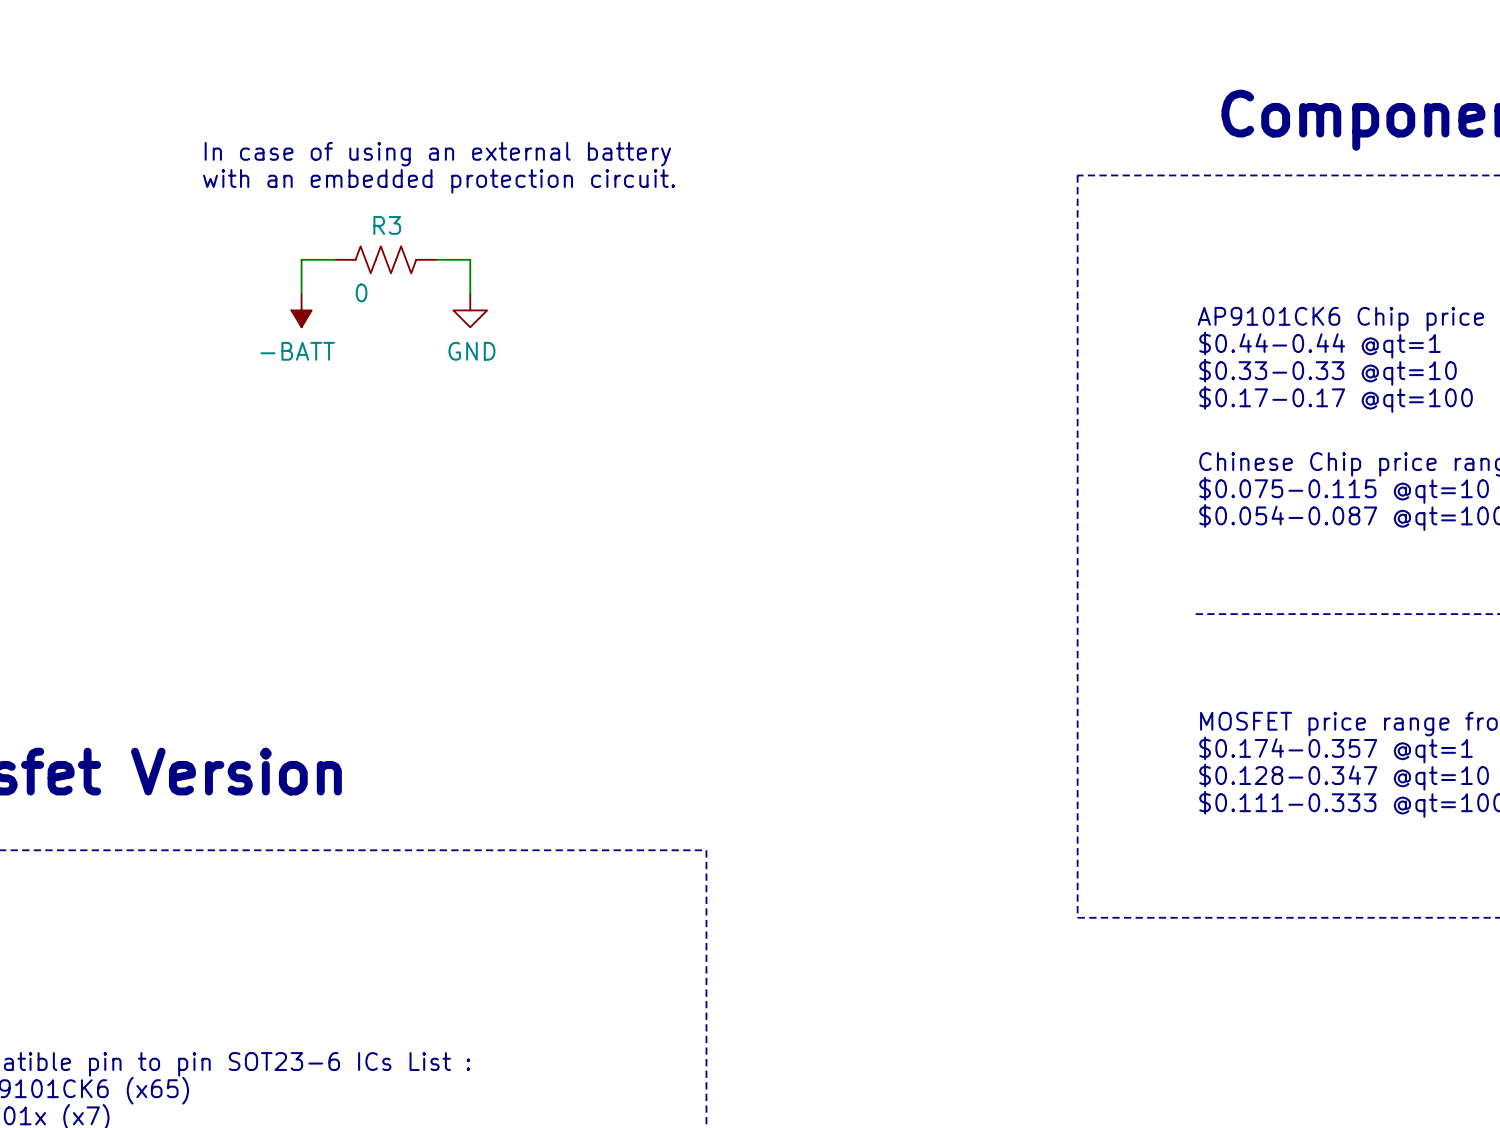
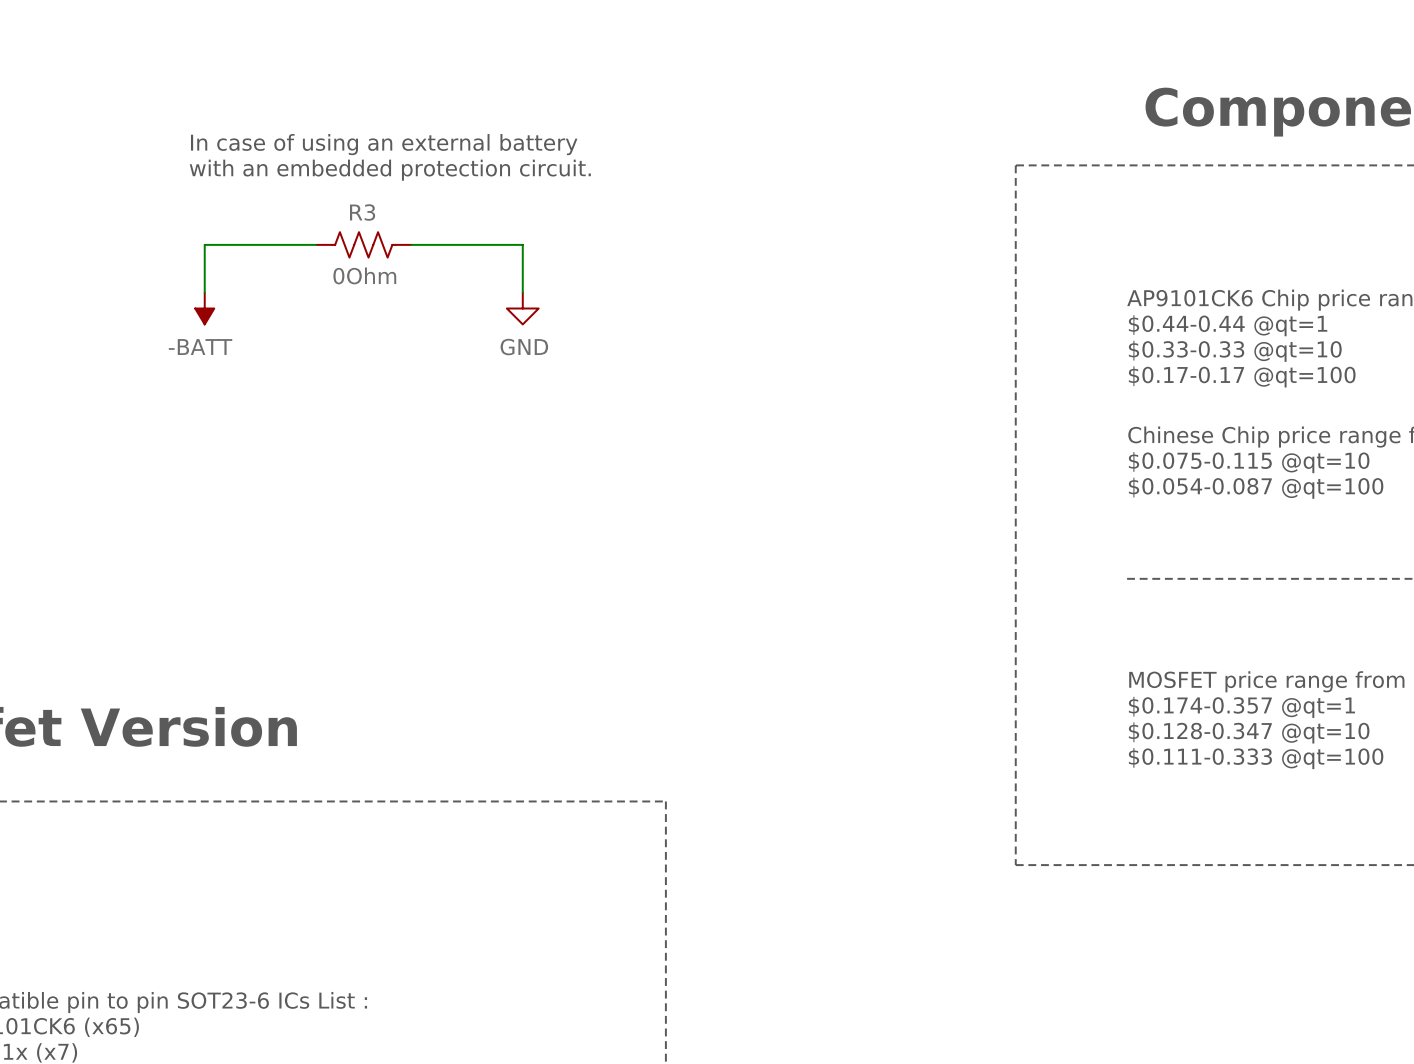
wire: (301, 259) (301, 293) -> (284, 244) (204, 244) (204, 292)
wire: (470, 259) (470, 293) -> (443, 244) (522, 244) (522, 292)
R3 value: 0 (361, 292) -> 0Ohm (364, 275)
power symbol position: -BATT (301, 310) -> -BATT (204, 308)
power symbol position: GND (470, 310) -> GND (522, 308)

